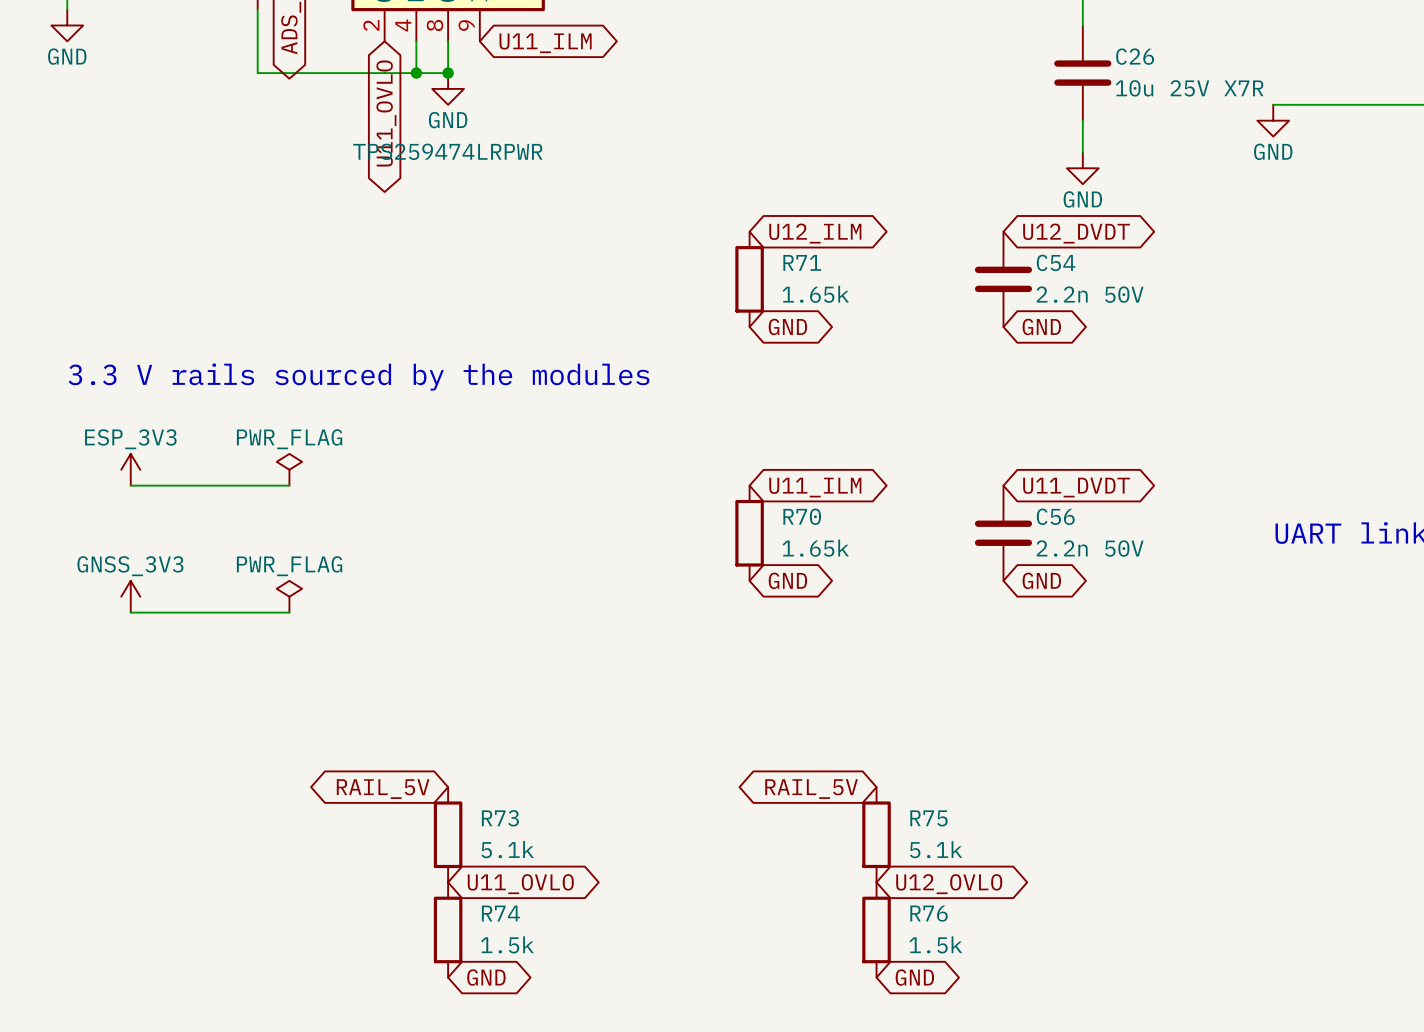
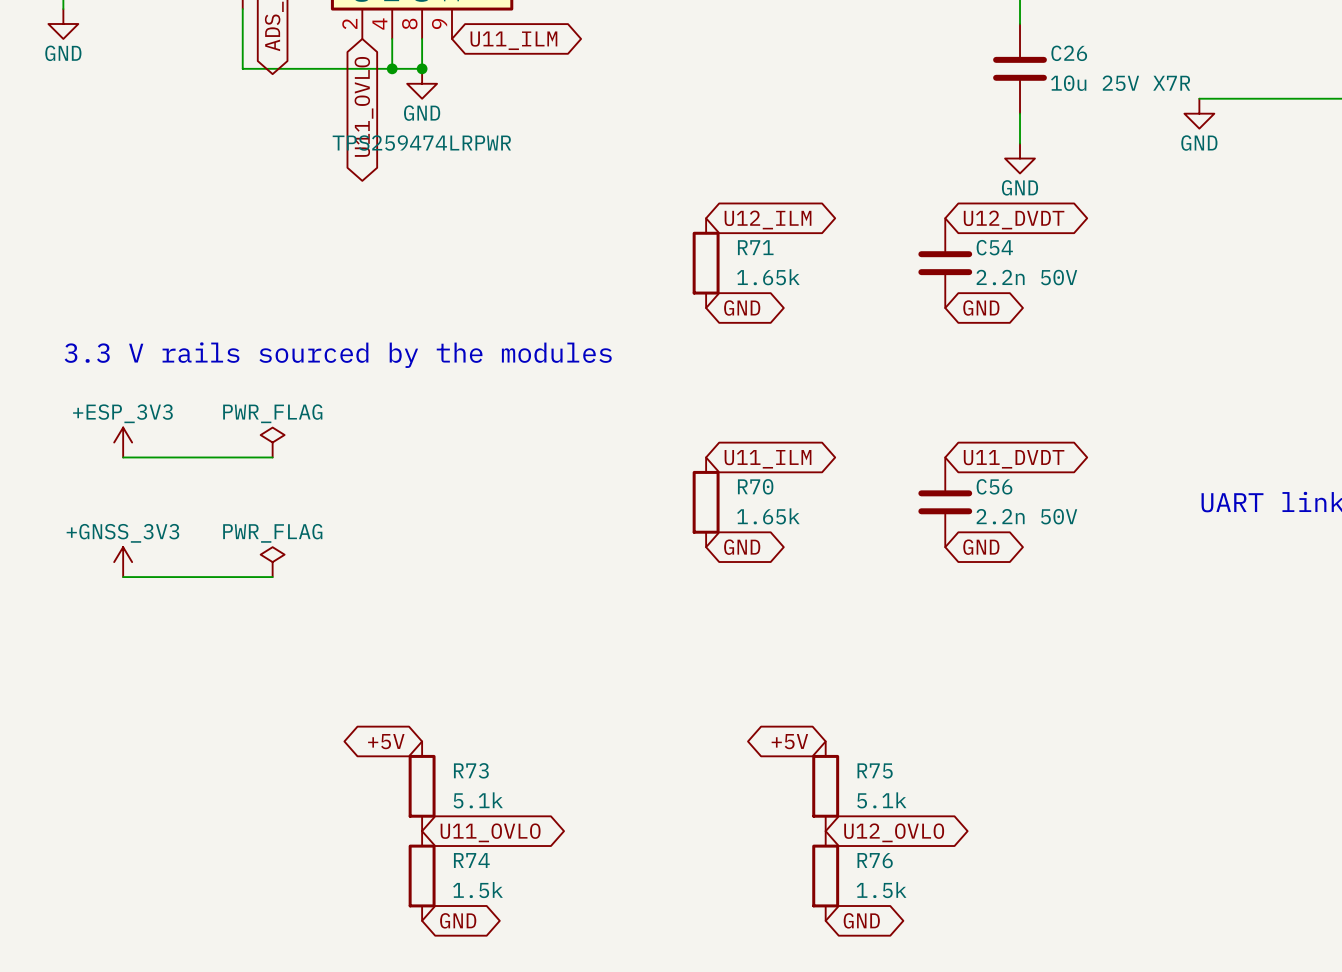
power symbol: ESP_3V3 (130, 469) -> +ESP_3V3 (123, 442)
power symbol: GNSS_3V3 (130, 596) -> +GNSS_3V3 (123, 562)
global label: RAIL_5V (383, 789) -> +5V (386, 741)
global label: RAIL_5V (811, 789) -> +5V (789, 741)

